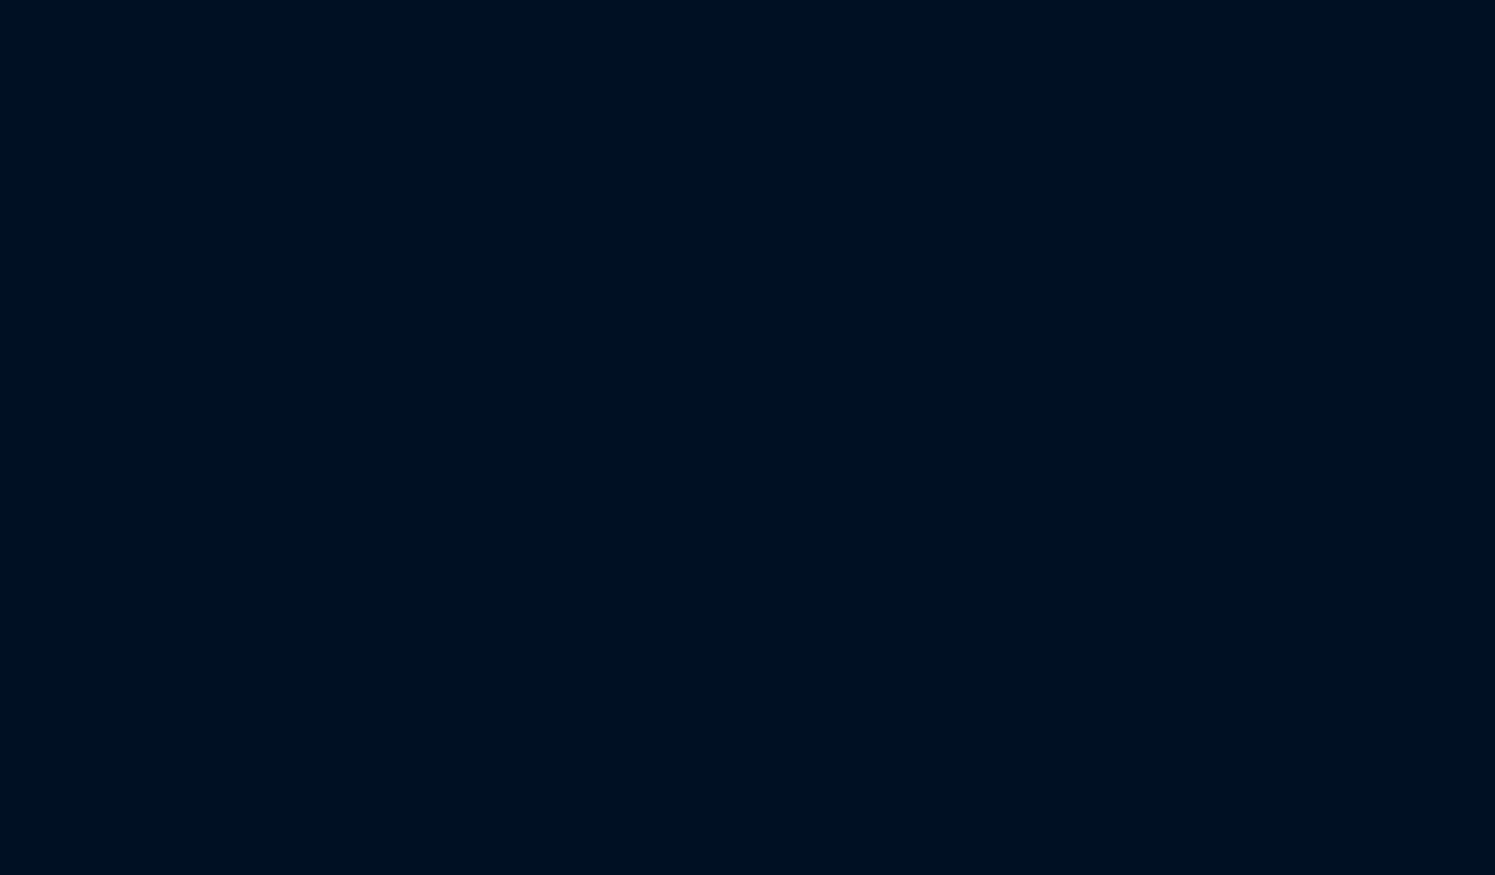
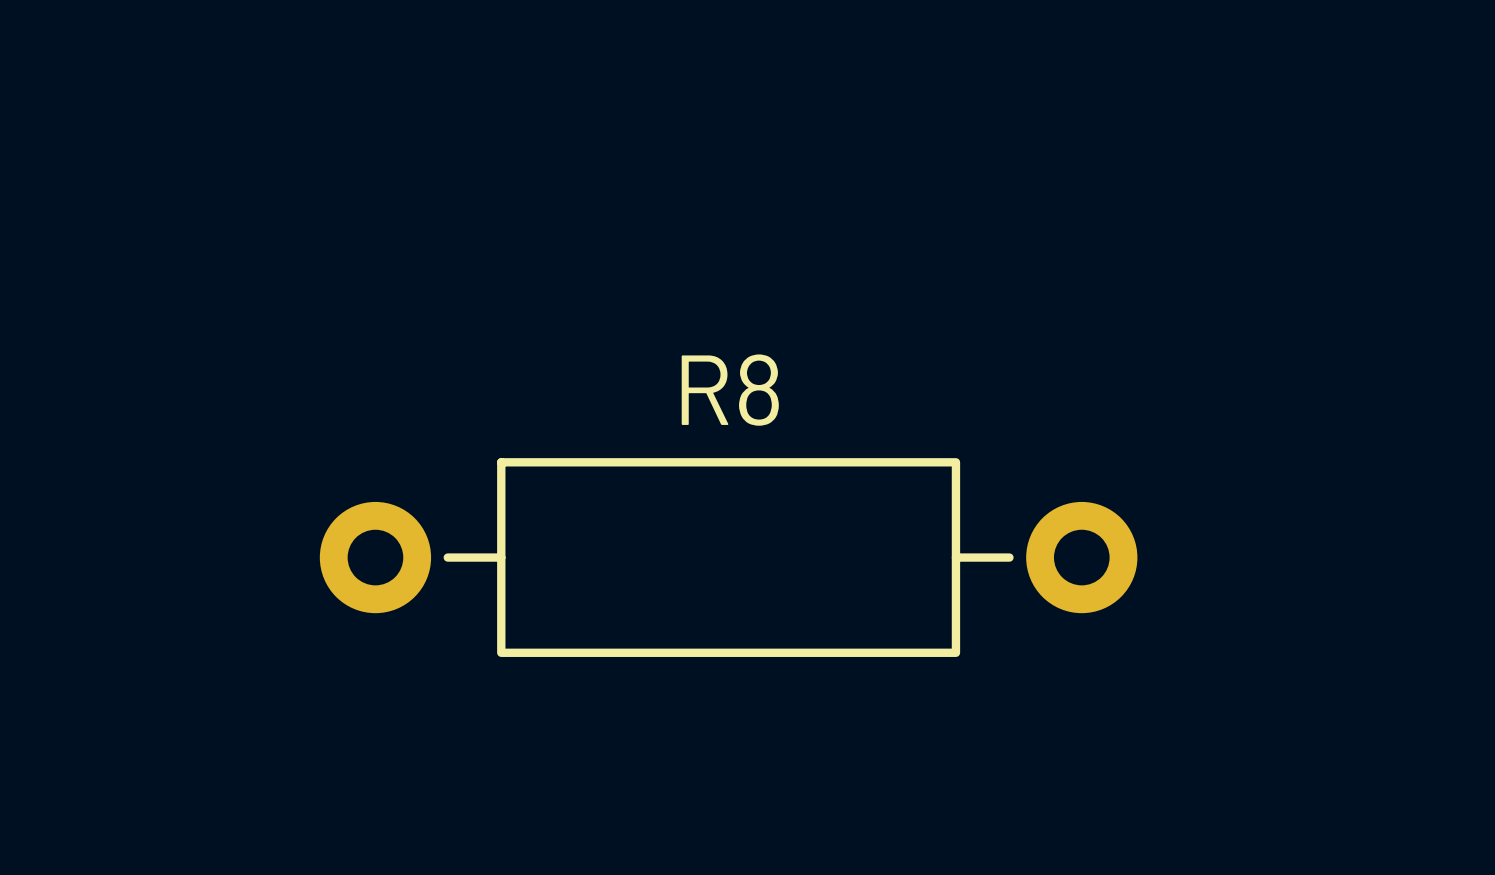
R8: none -> (728, 557)

